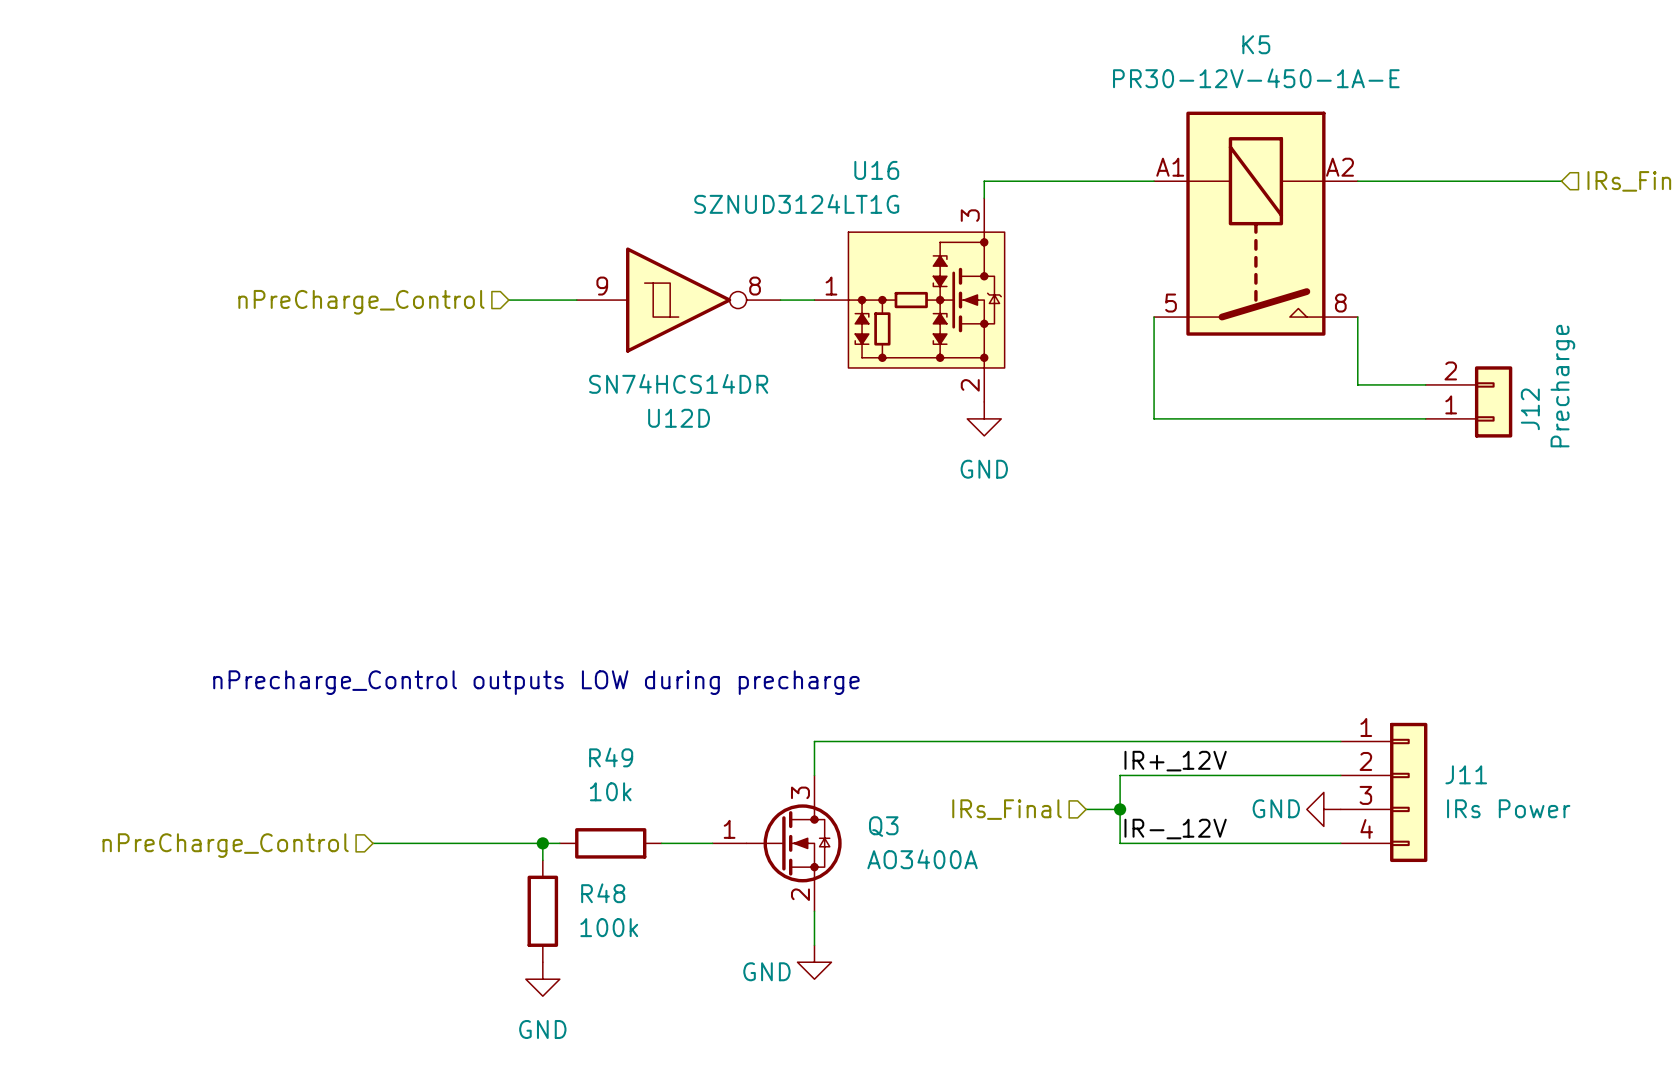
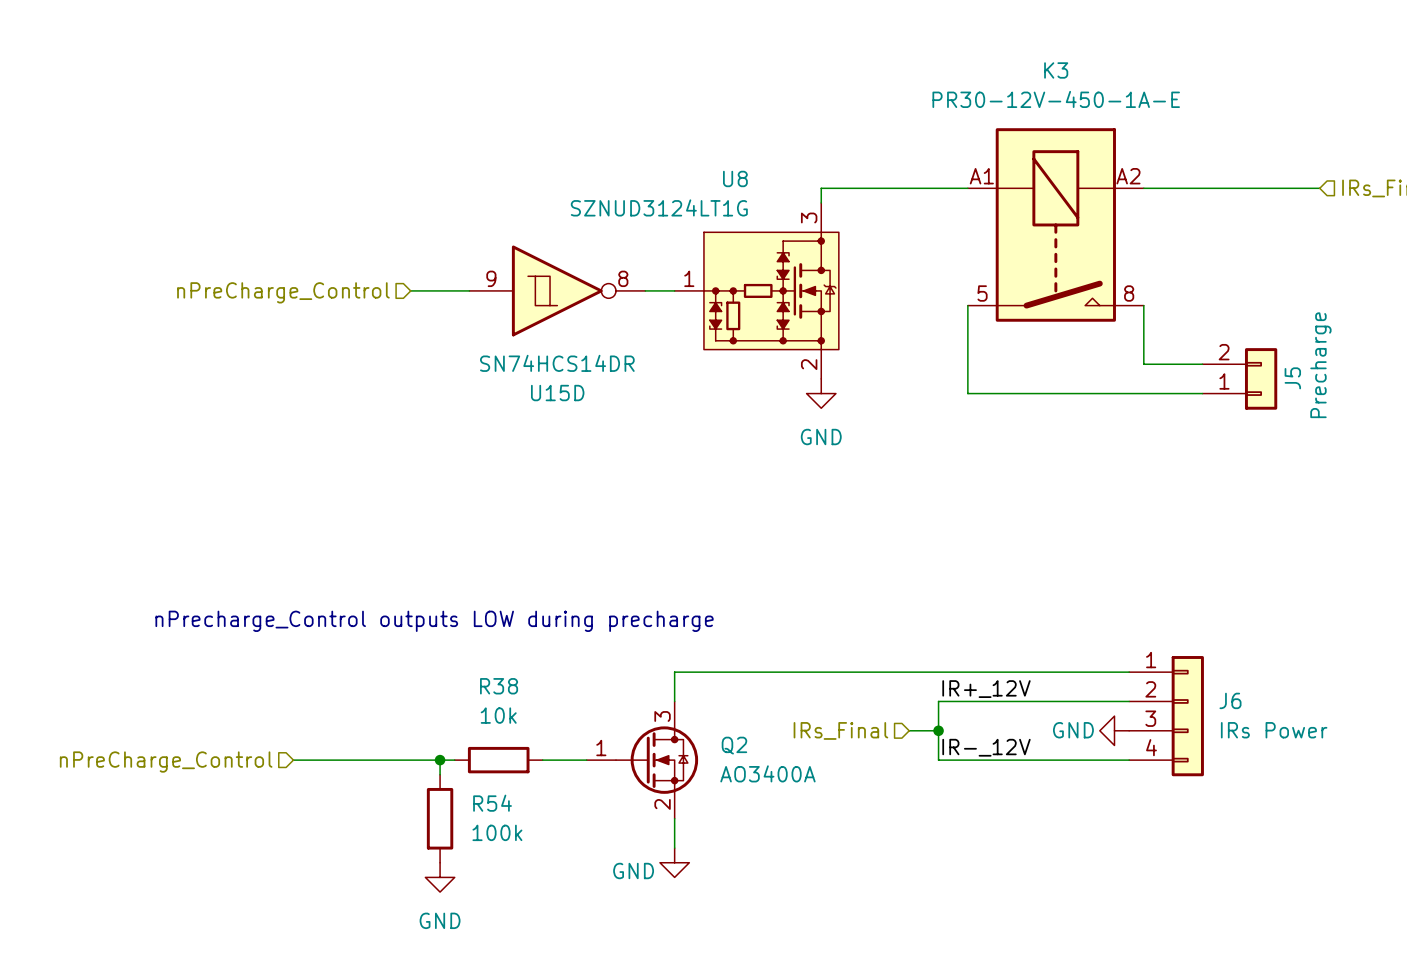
K5 name: K5 (1256, 44) -> K3 (1056, 70)
U16 name: U16 (876, 170) -> U8 (735, 178)
J12 name: J12 (1530, 409) -> J5 (1292, 378)
U12D name: U12D (679, 418) -> U15D (557, 393)
R49 name: R49 (611, 757) -> R38 (499, 686)
J11 name: J11 (1466, 774) -> J6 (1230, 700)
Q3 name: Q3 (883, 826) -> Q2 (734, 745)
R48 name: R48 (603, 893) -> R54 (492, 803)

